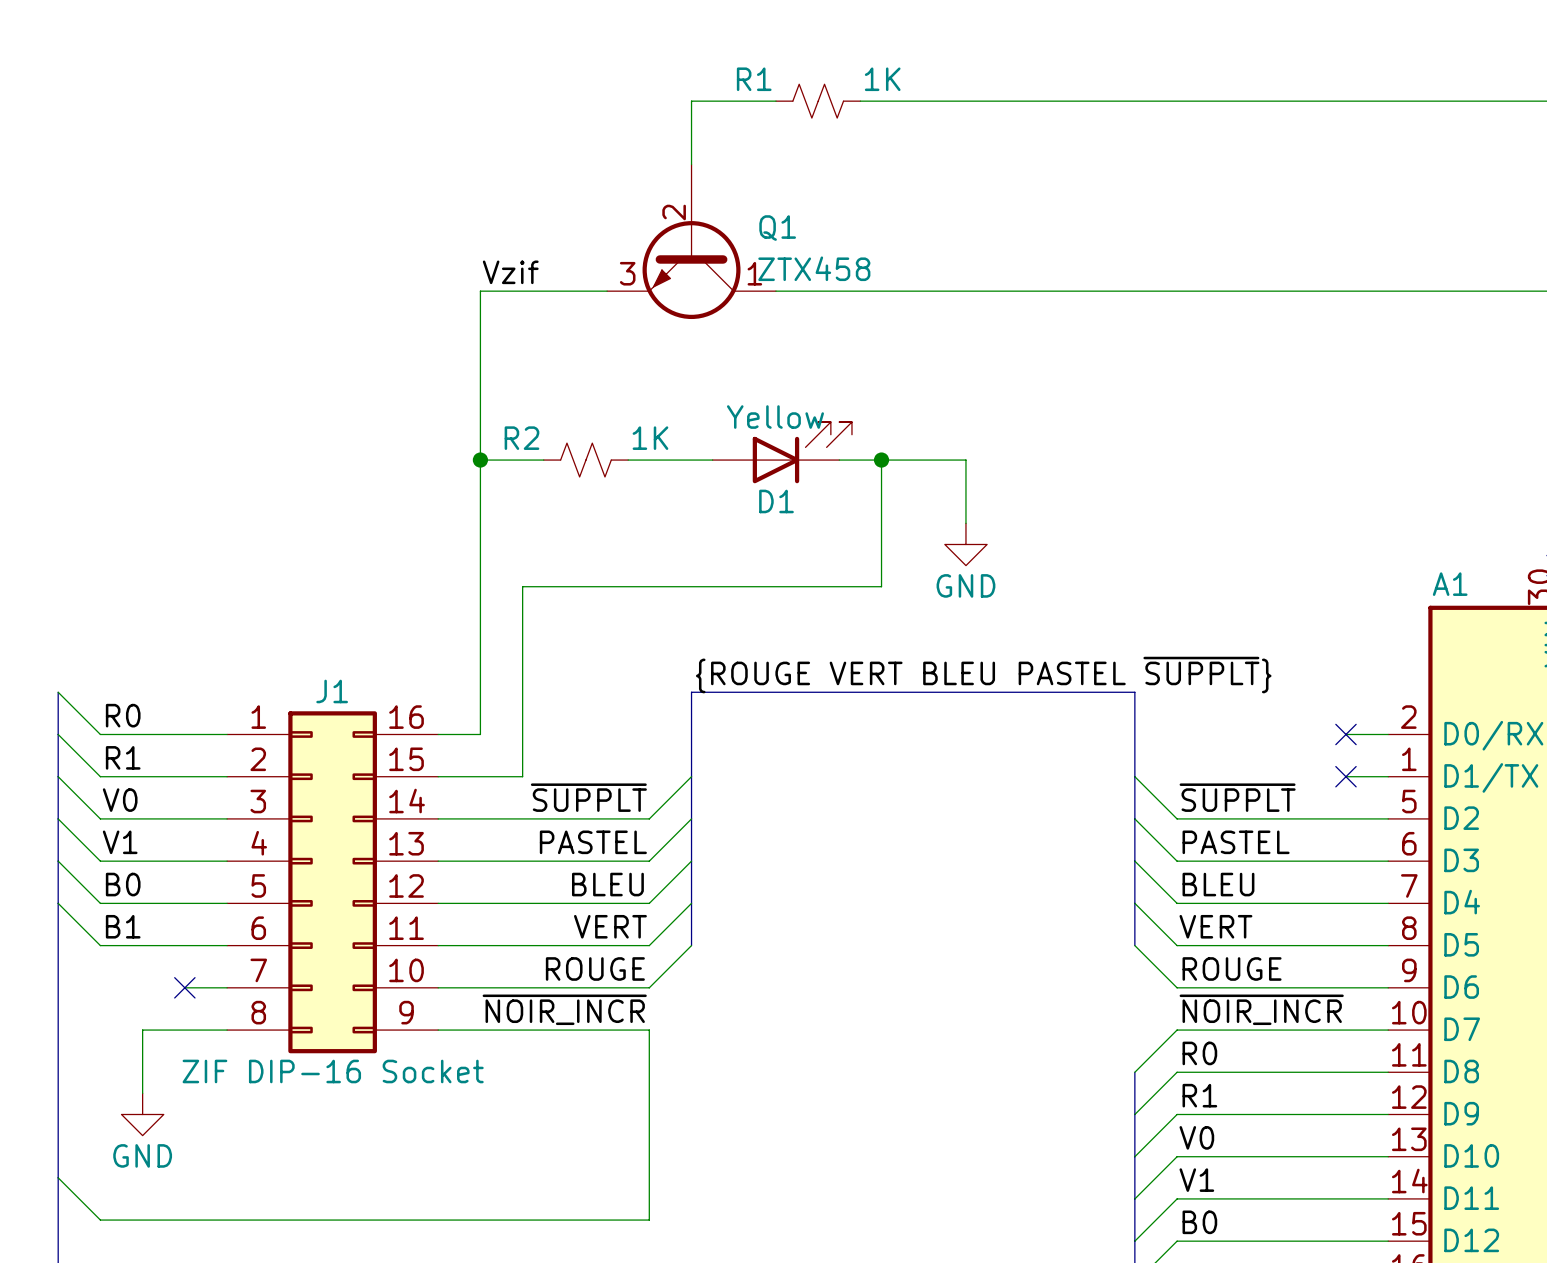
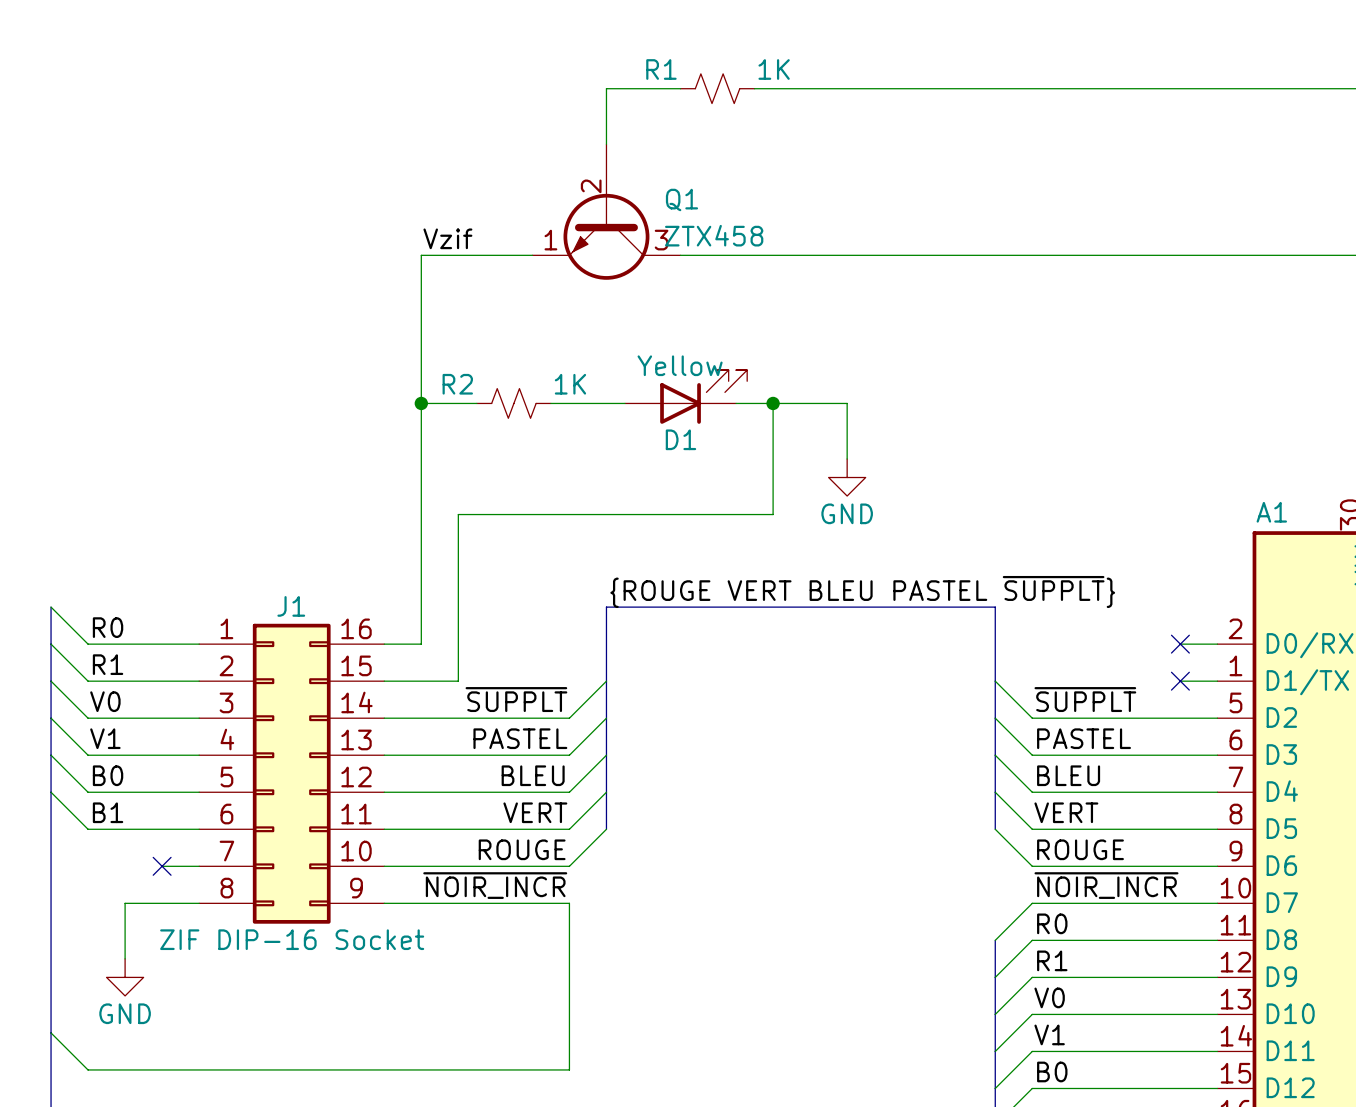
Q1 pin number: 3 (627, 273) -> 1 (550, 240)
Q1 pin number: 1 (754, 273) -> 3 (661, 240)

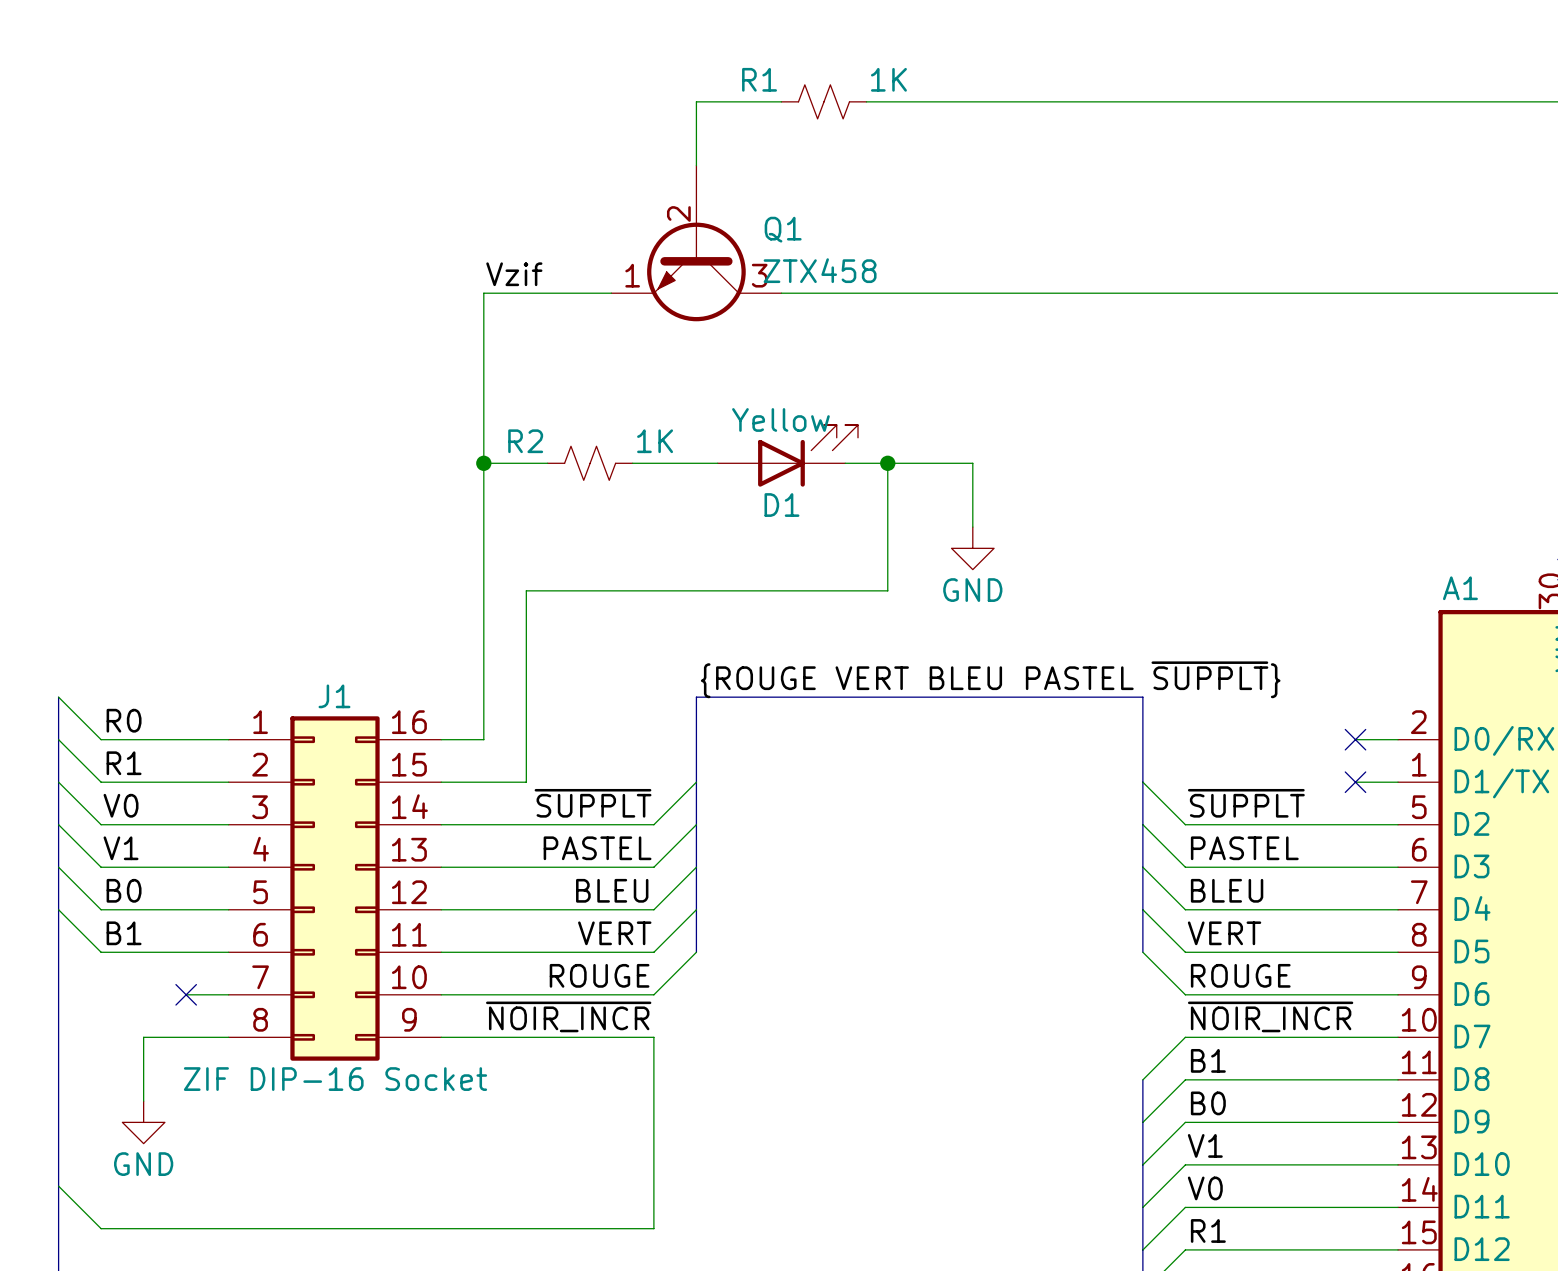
label: R0 (1052, 923) -> B1 (1208, 1060)
label: R1 (1052, 960) -> B0 (1208, 1103)
label: V0 (1049, 997) -> V1 (1205, 1145)
label: V1 (1049, 1034) -> V0 (1205, 1188)
label: B0 (1052, 1071) -> R1 (1208, 1230)

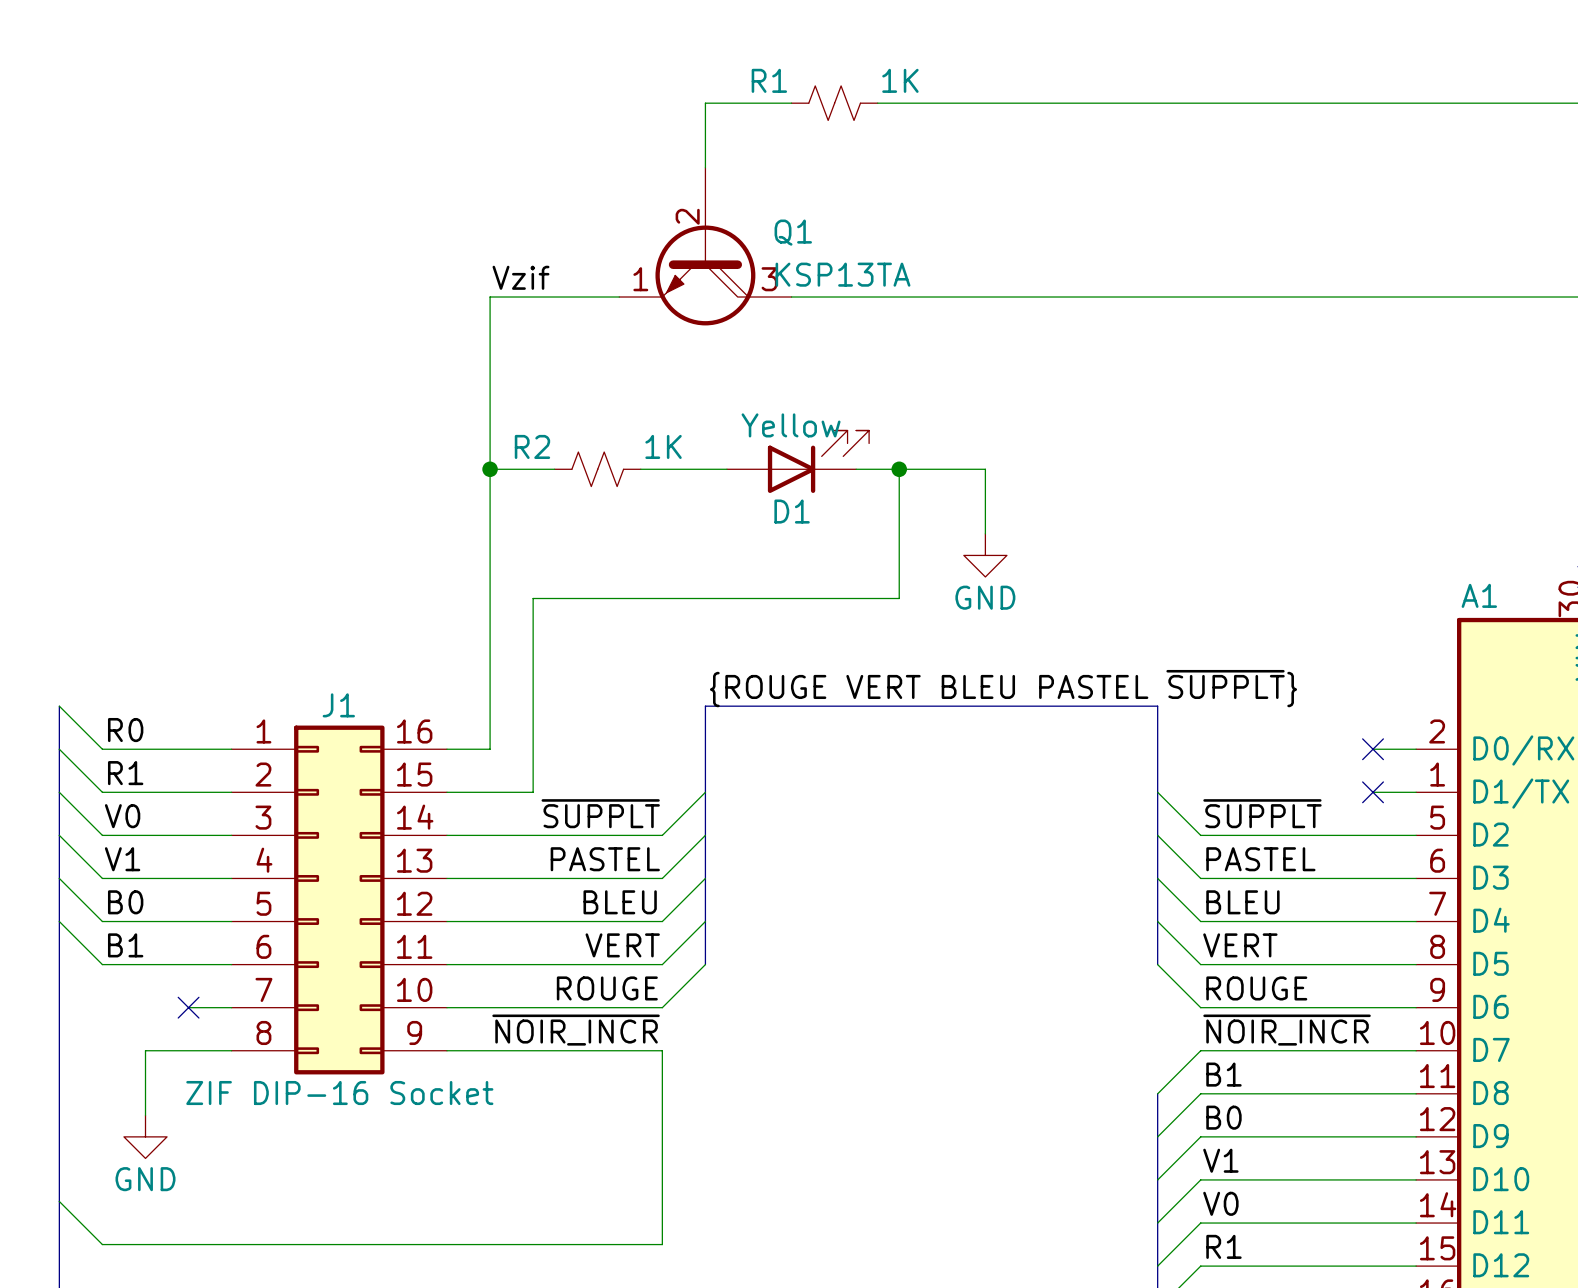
Q1 symbol: [611, 165, 782, 322] -> [619, 167, 792, 326]
Q1 value: ZTX458 (820, 270) -> KSP13TA (843, 274)

